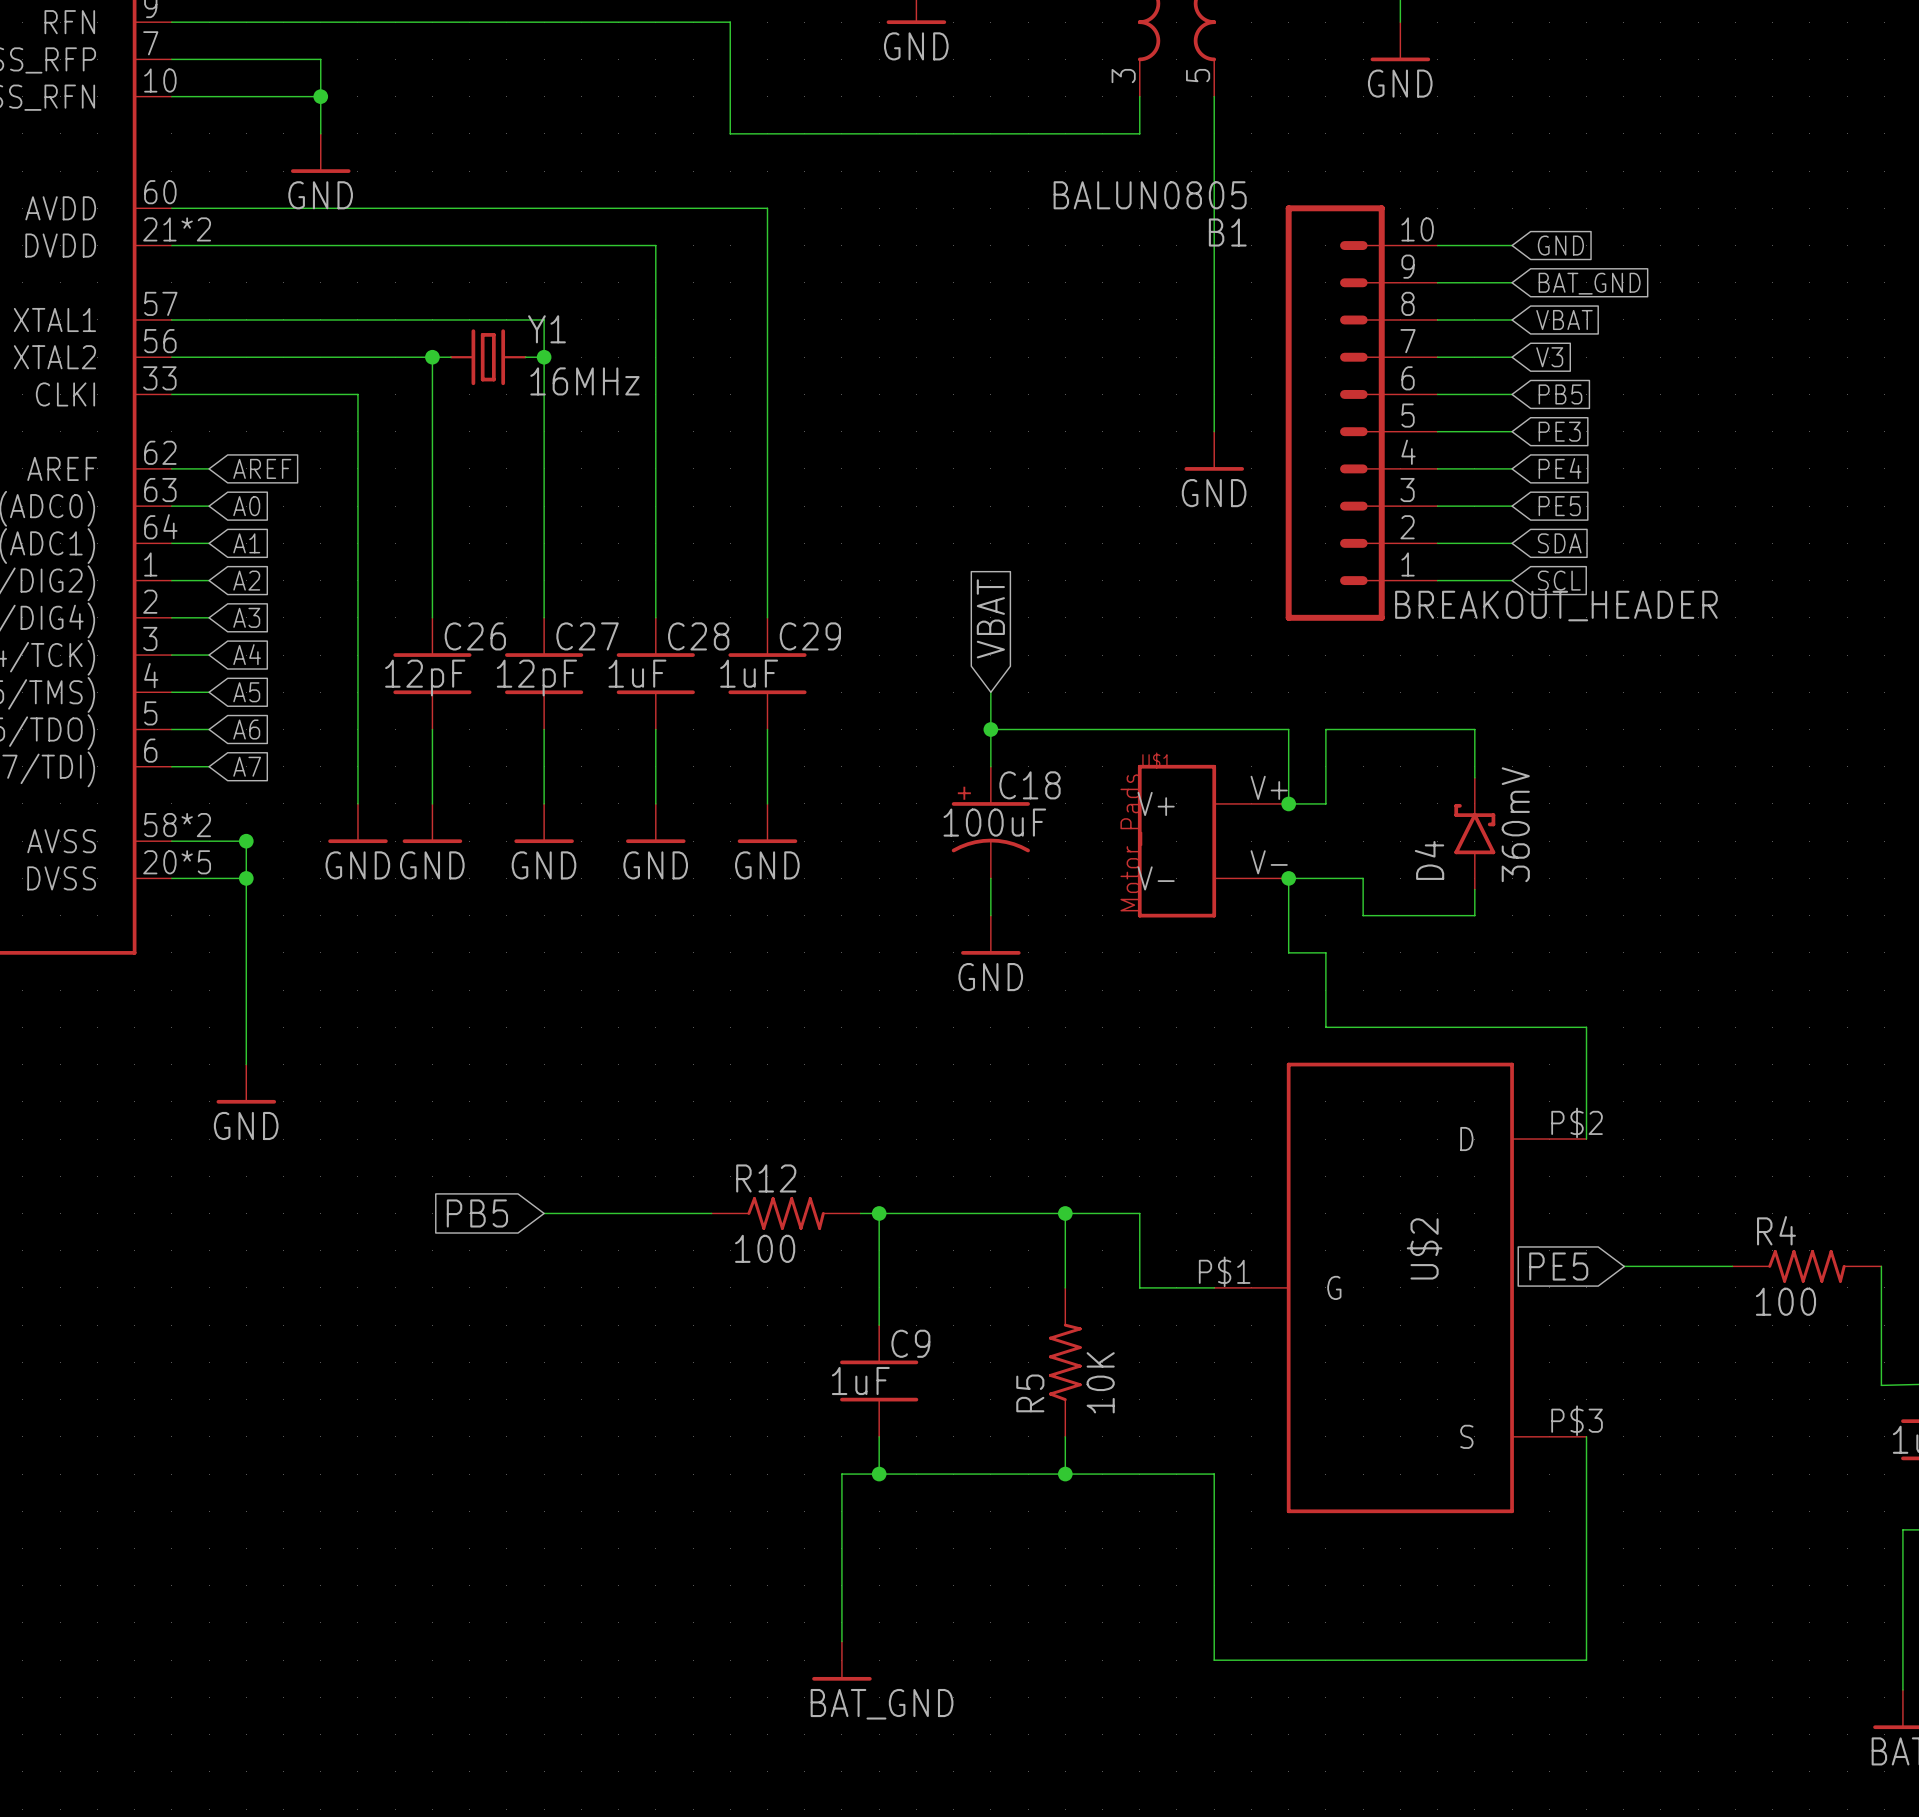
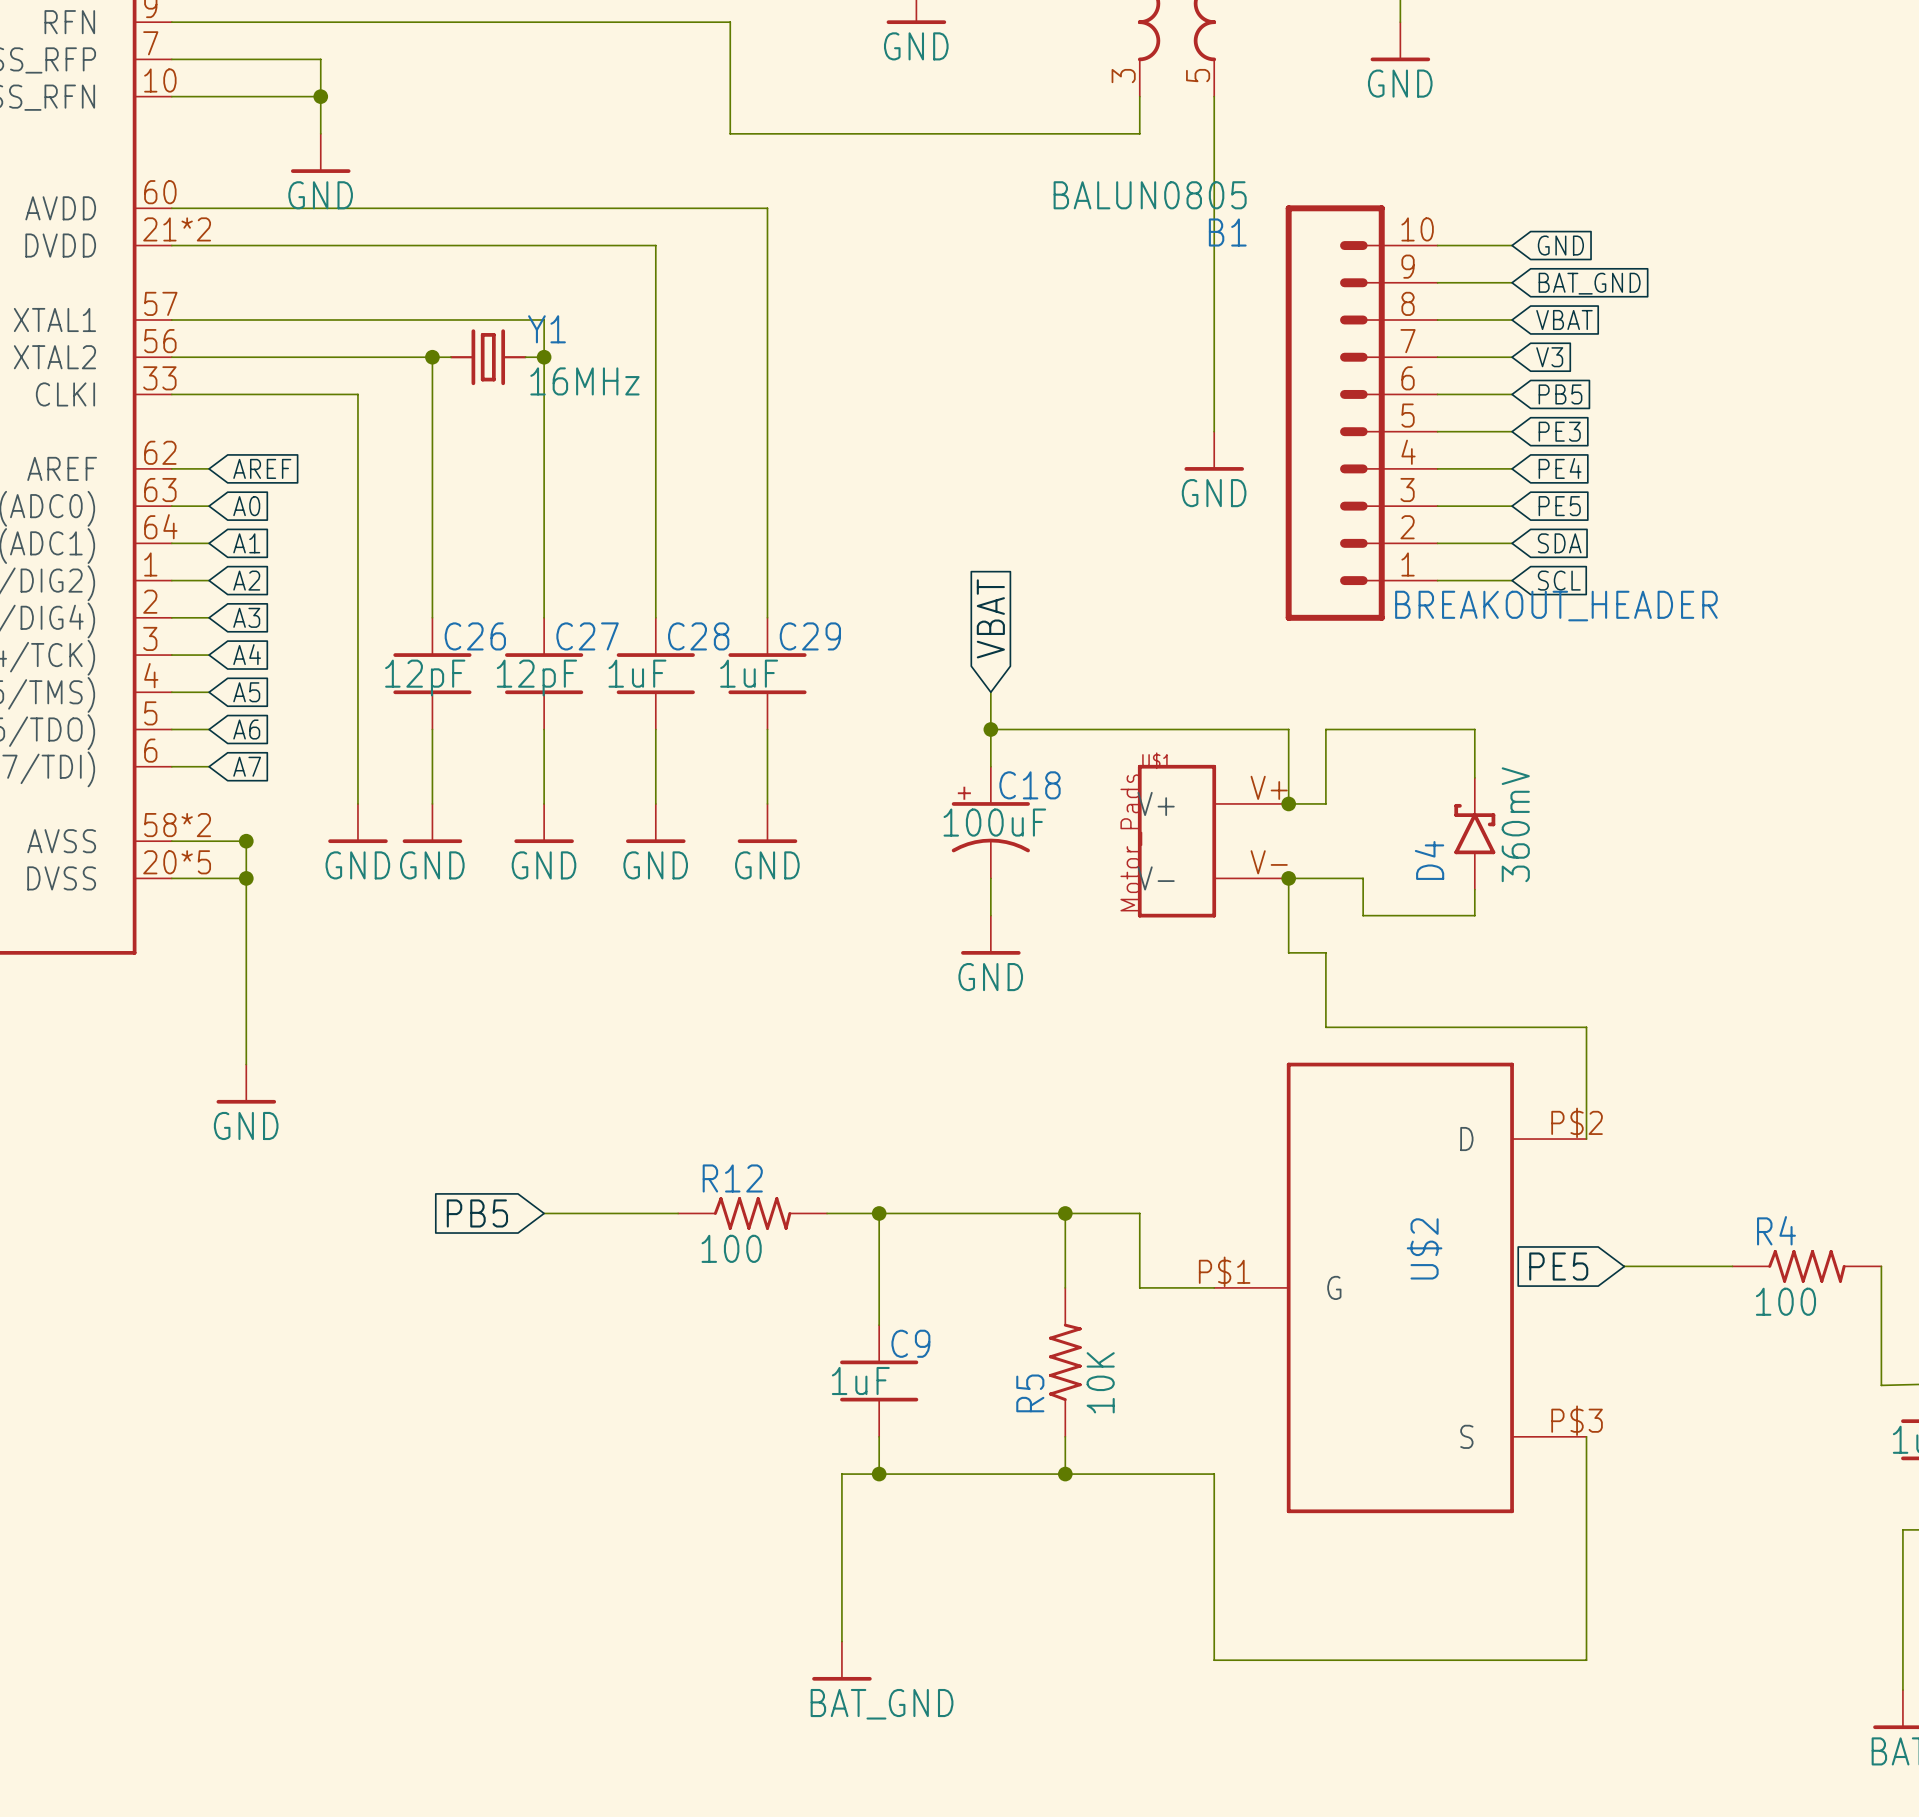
R12 position: (786, 1213) -> (752, 1213)

